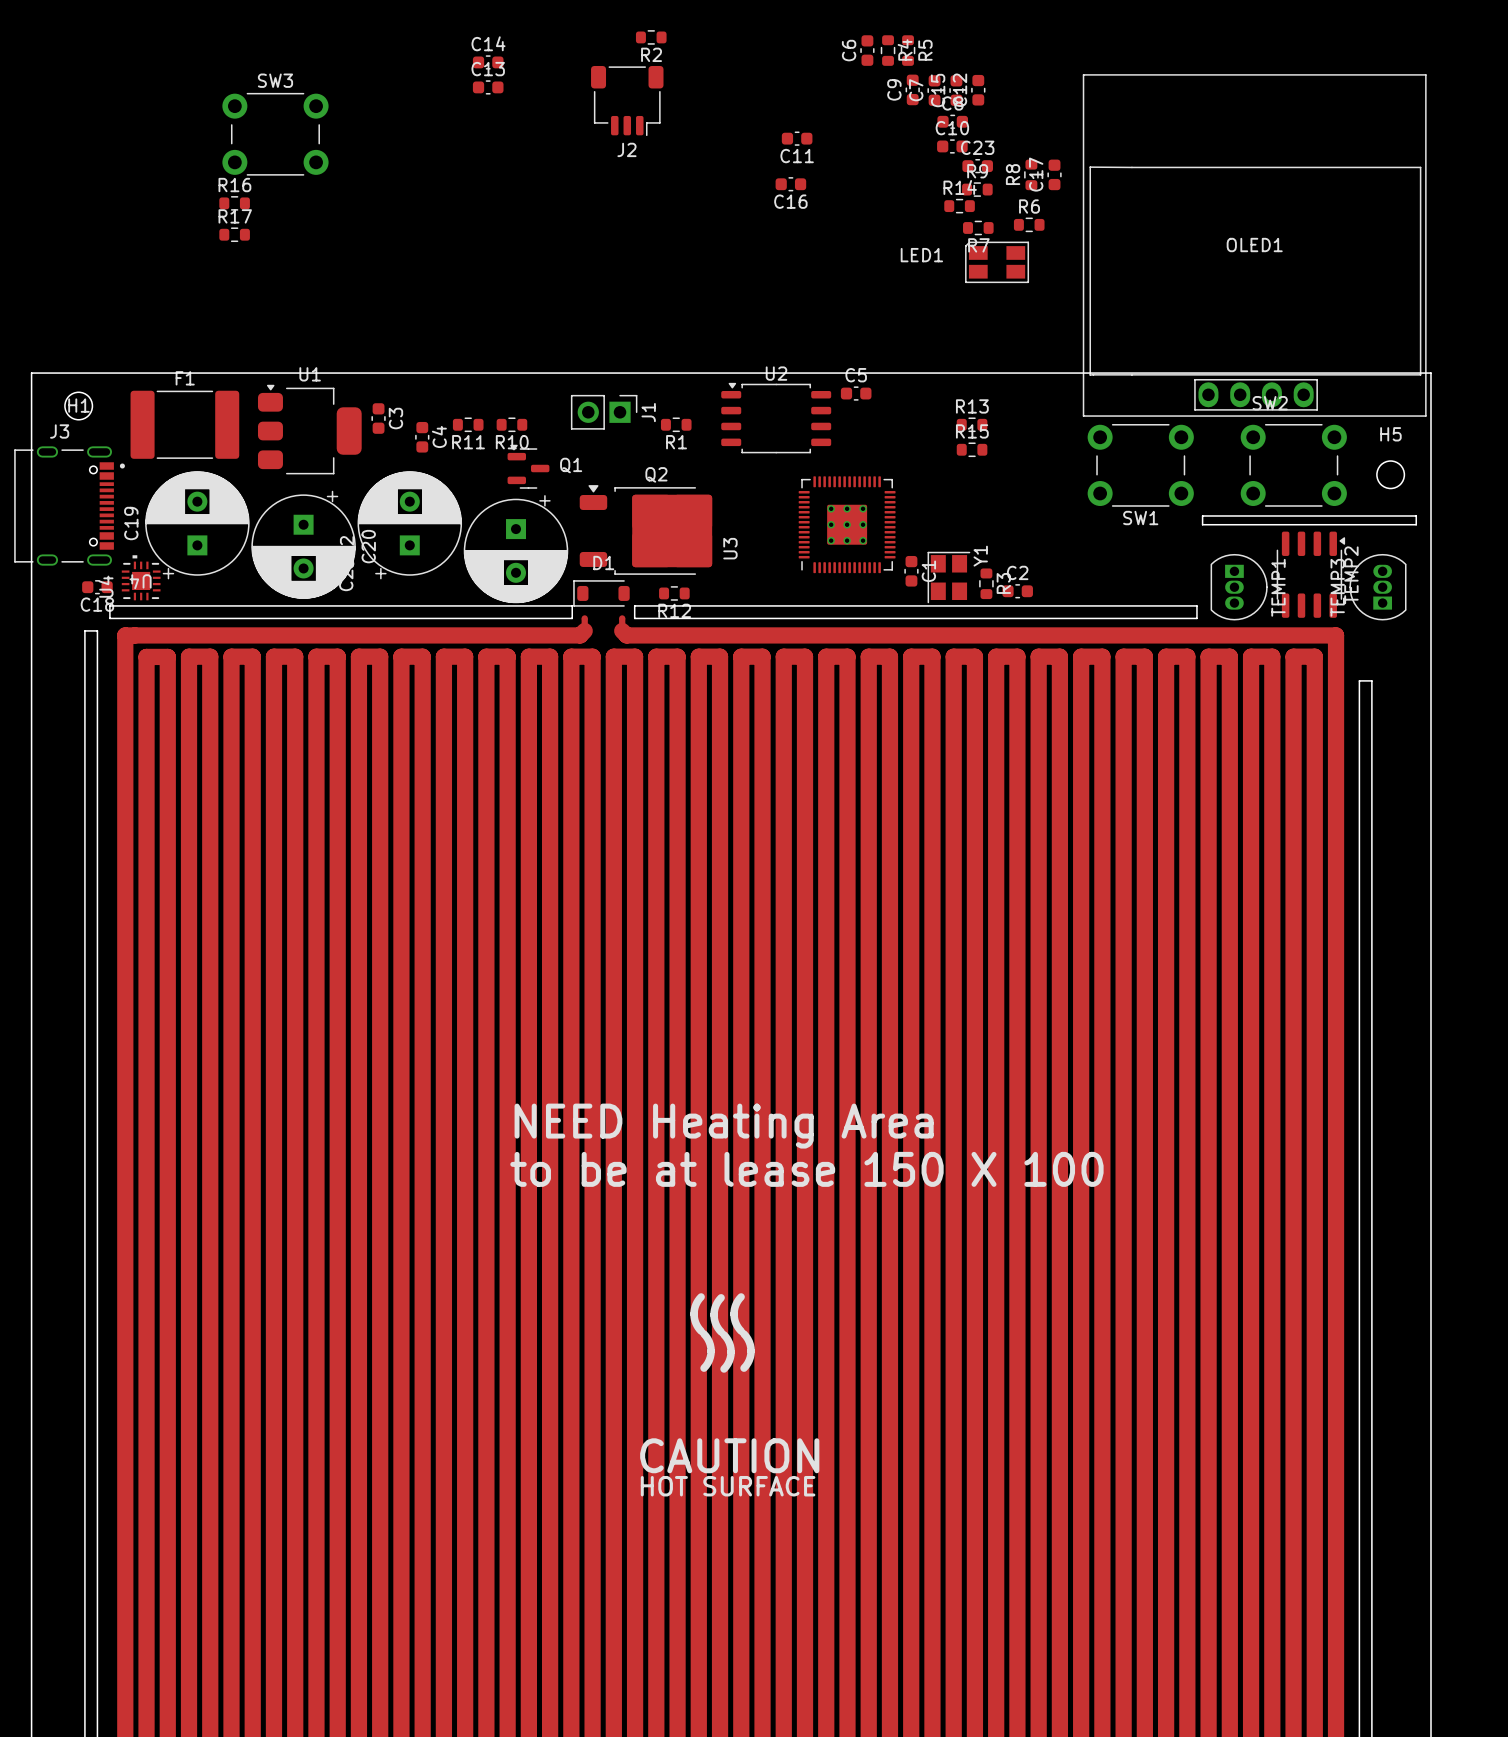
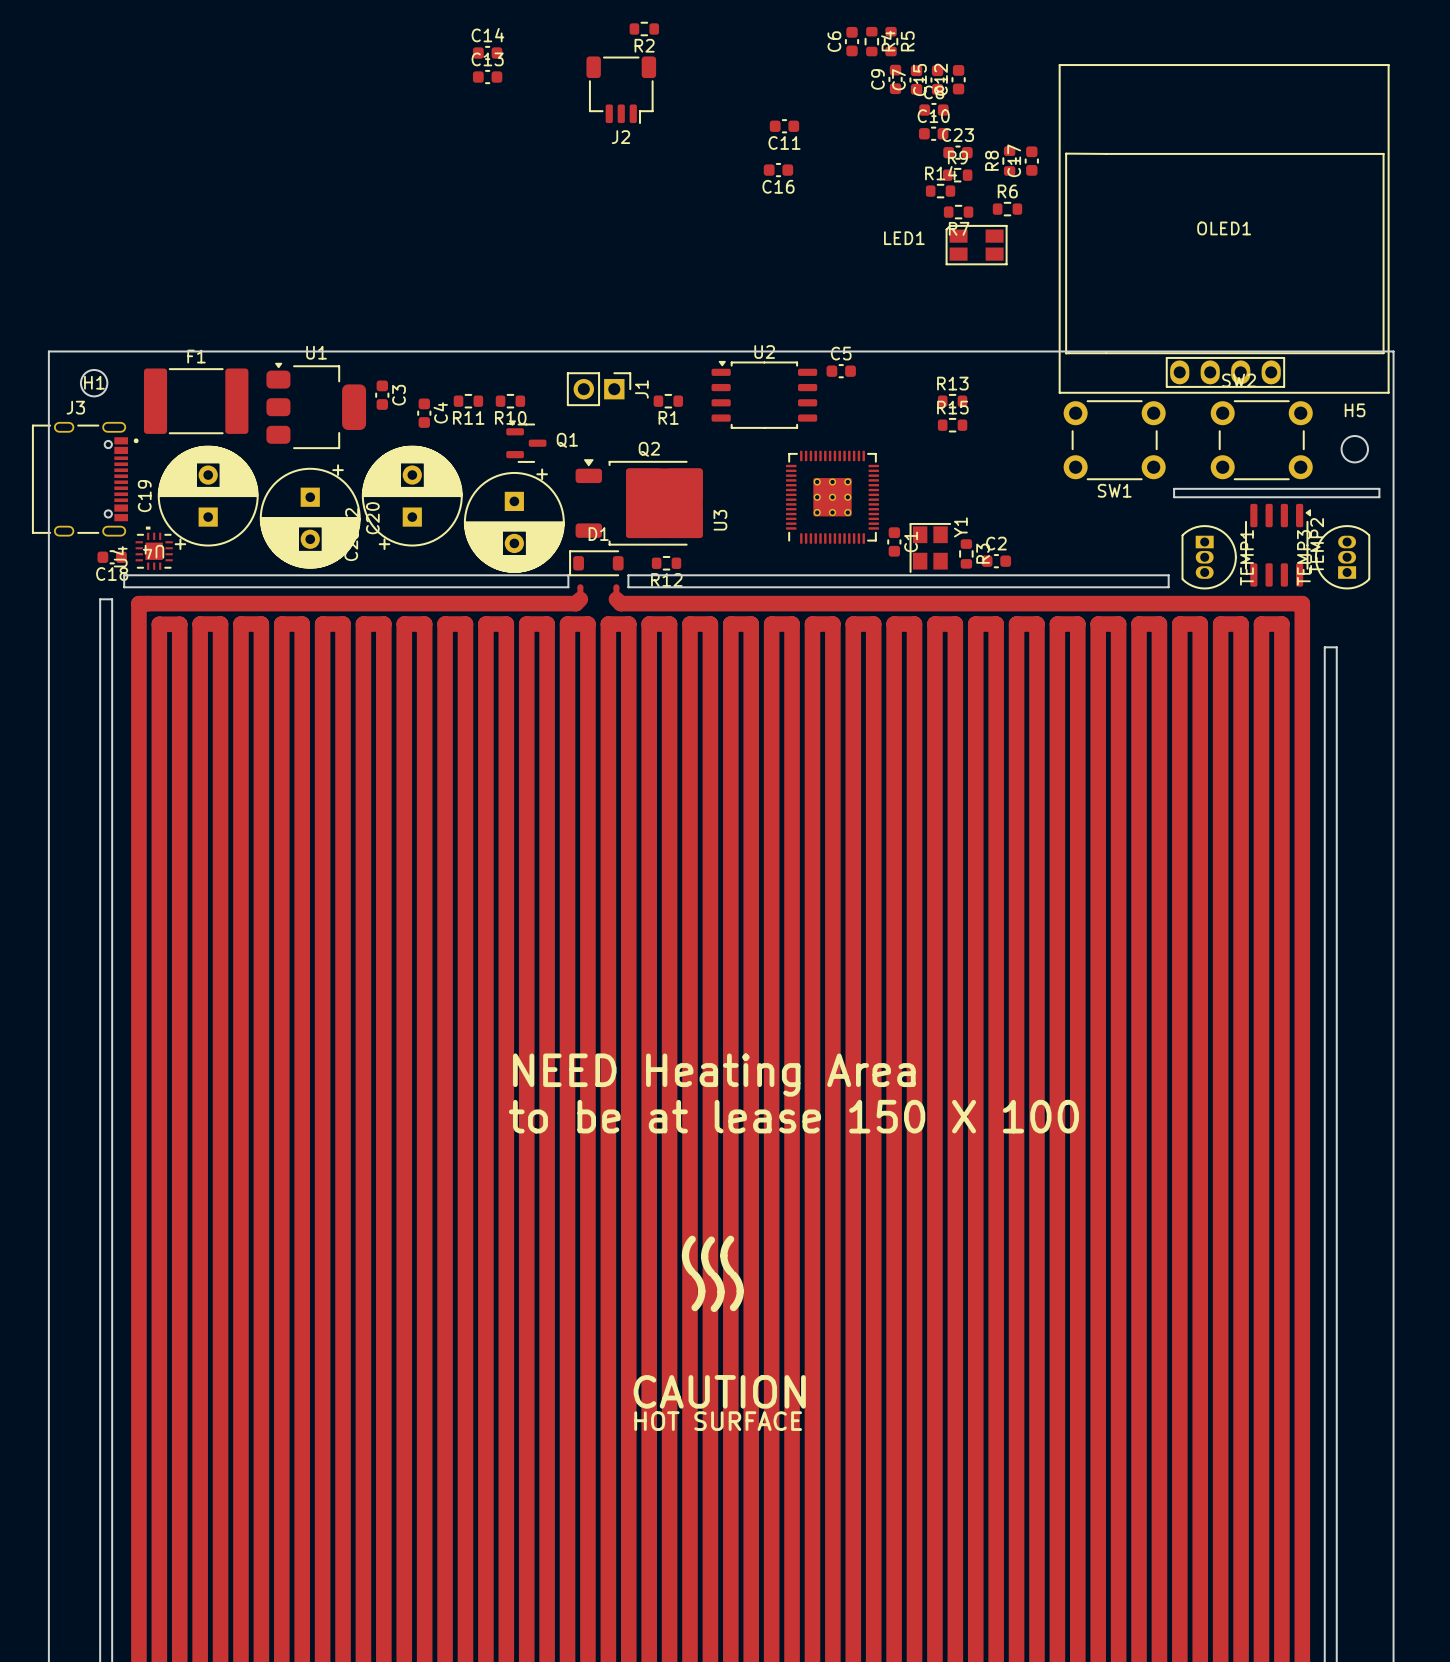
SW3: (275, 134) -> none
R16: (234, 203) -> none
R17: (234, 234) -> none

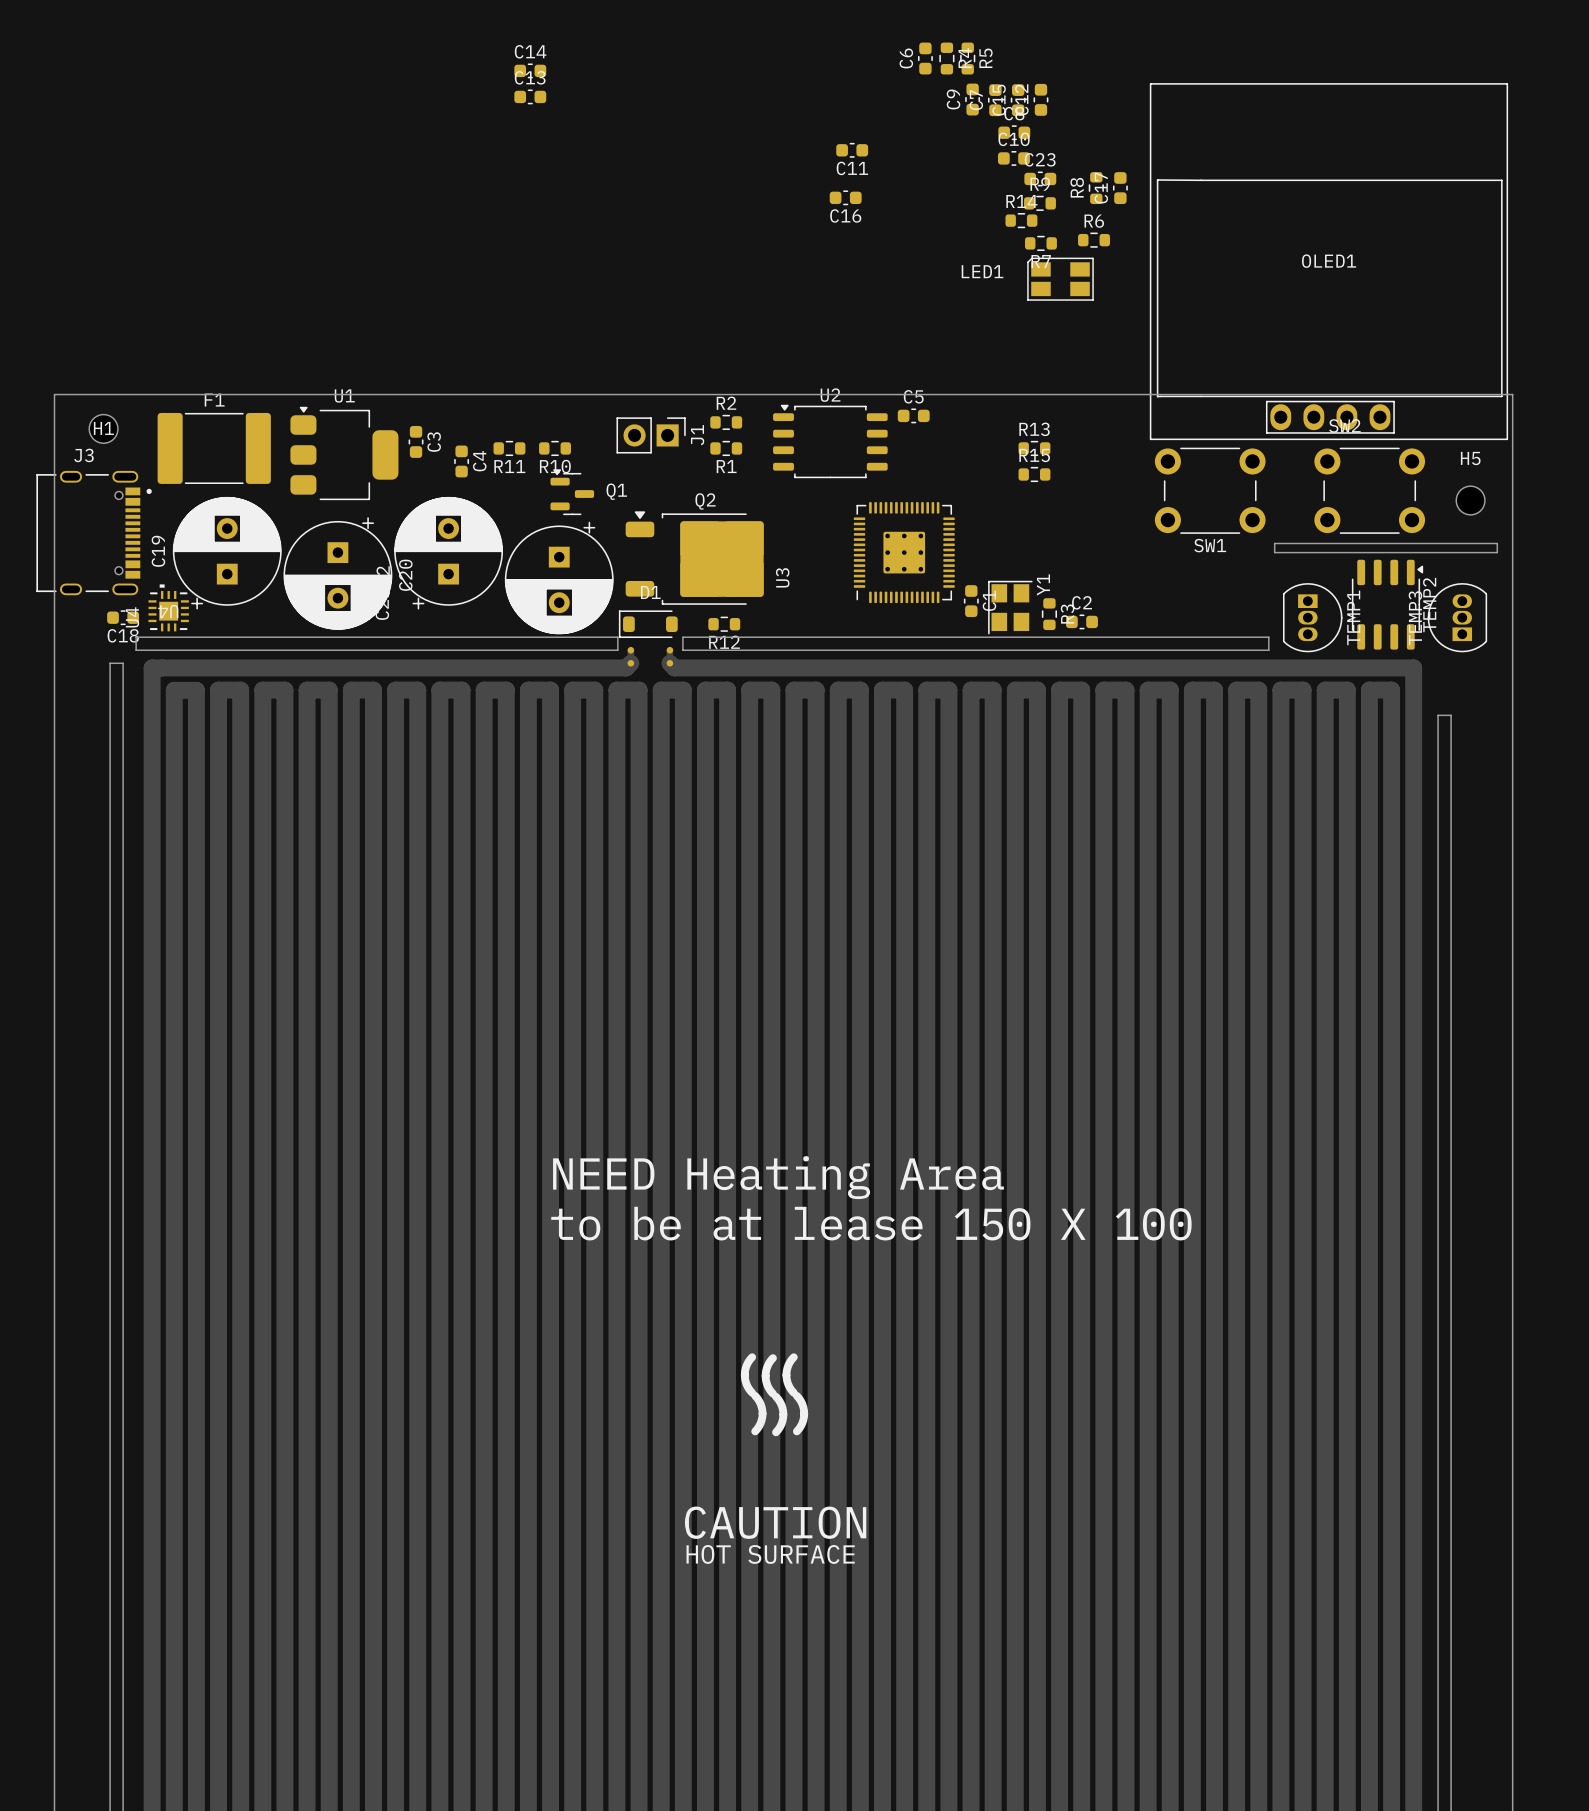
R2 position: (644, 29) -> (726, 422)
R2 name position: R2 (644, 45) -> R2 (726, 403)
J2: (621, 90) -> none

